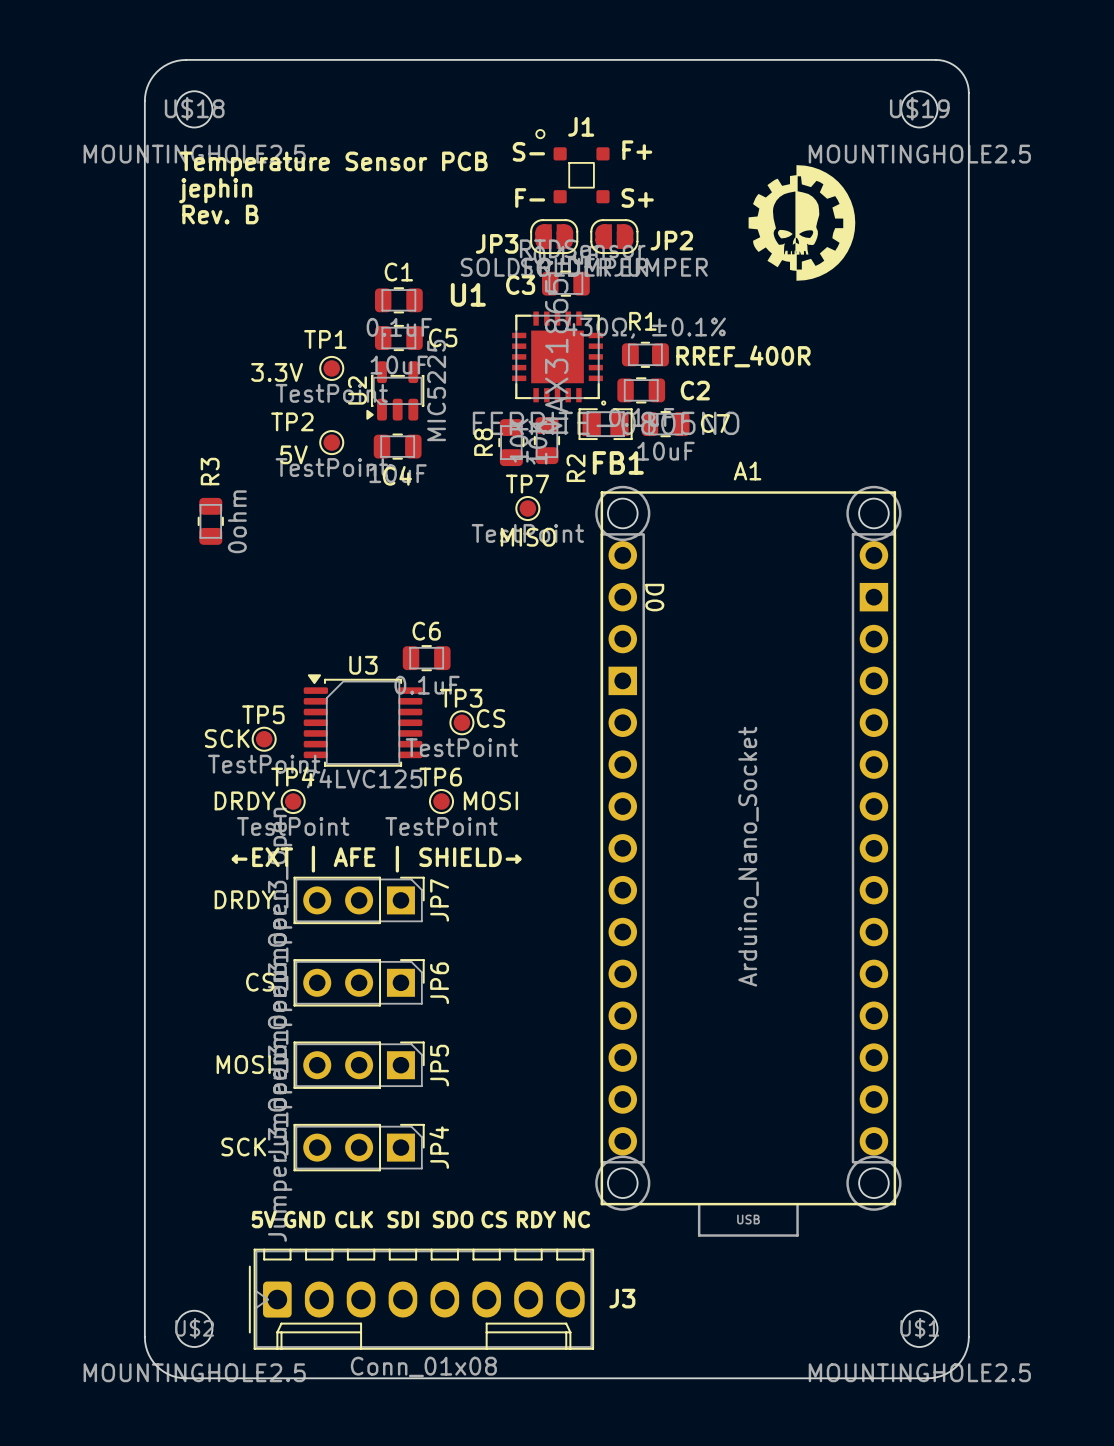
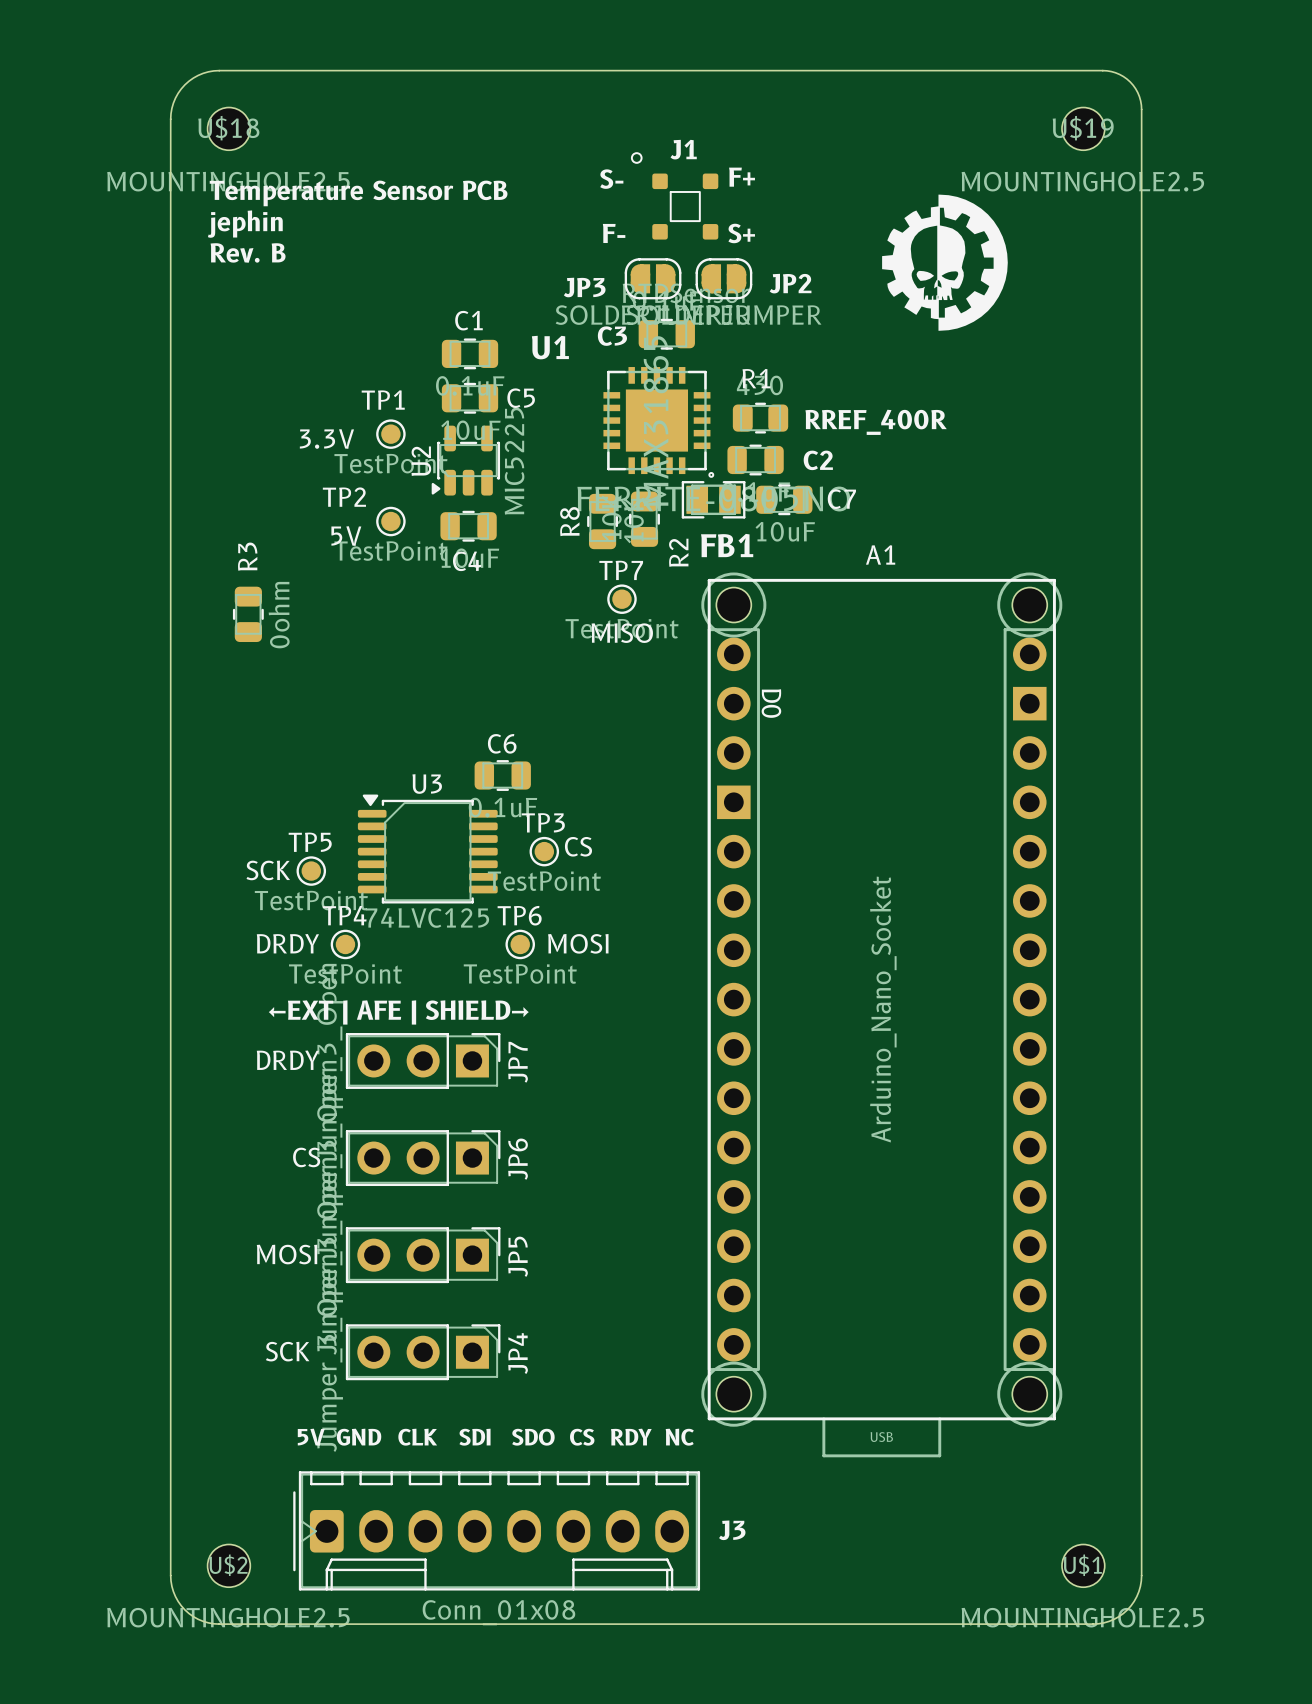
R1 value: 430Ω, ±0.1% (645, 327) -> 430 (759, 385)

